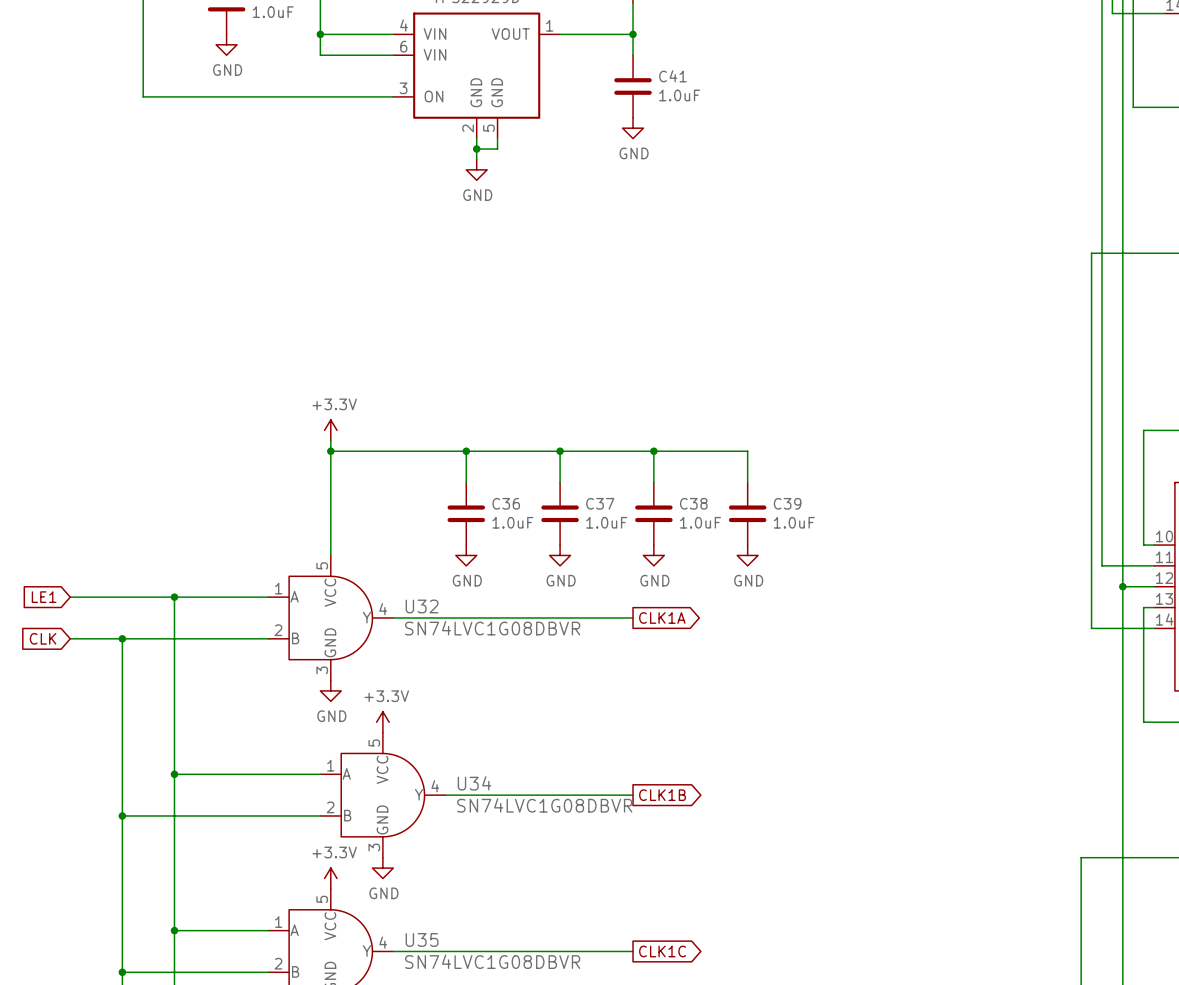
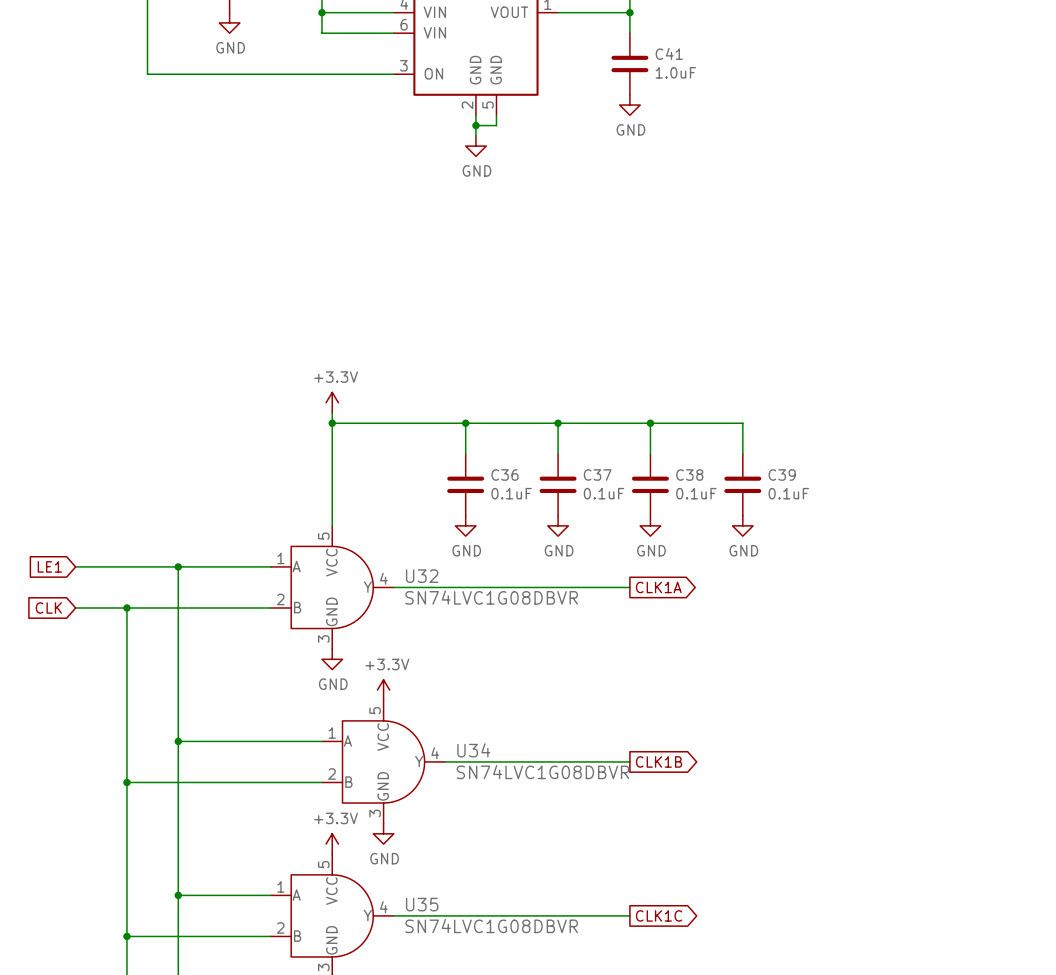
C36 value: 1.0uF (512, 522) -> 0.1uF (511, 493)
C37 value: 1.0uF (606, 522) -> 0.1uF (603, 493)
C38 value: 1.0uF (700, 522) -> 0.1uF (696, 493)
C39 value: 1.0uF (794, 522) -> 0.1uF (788, 493)

